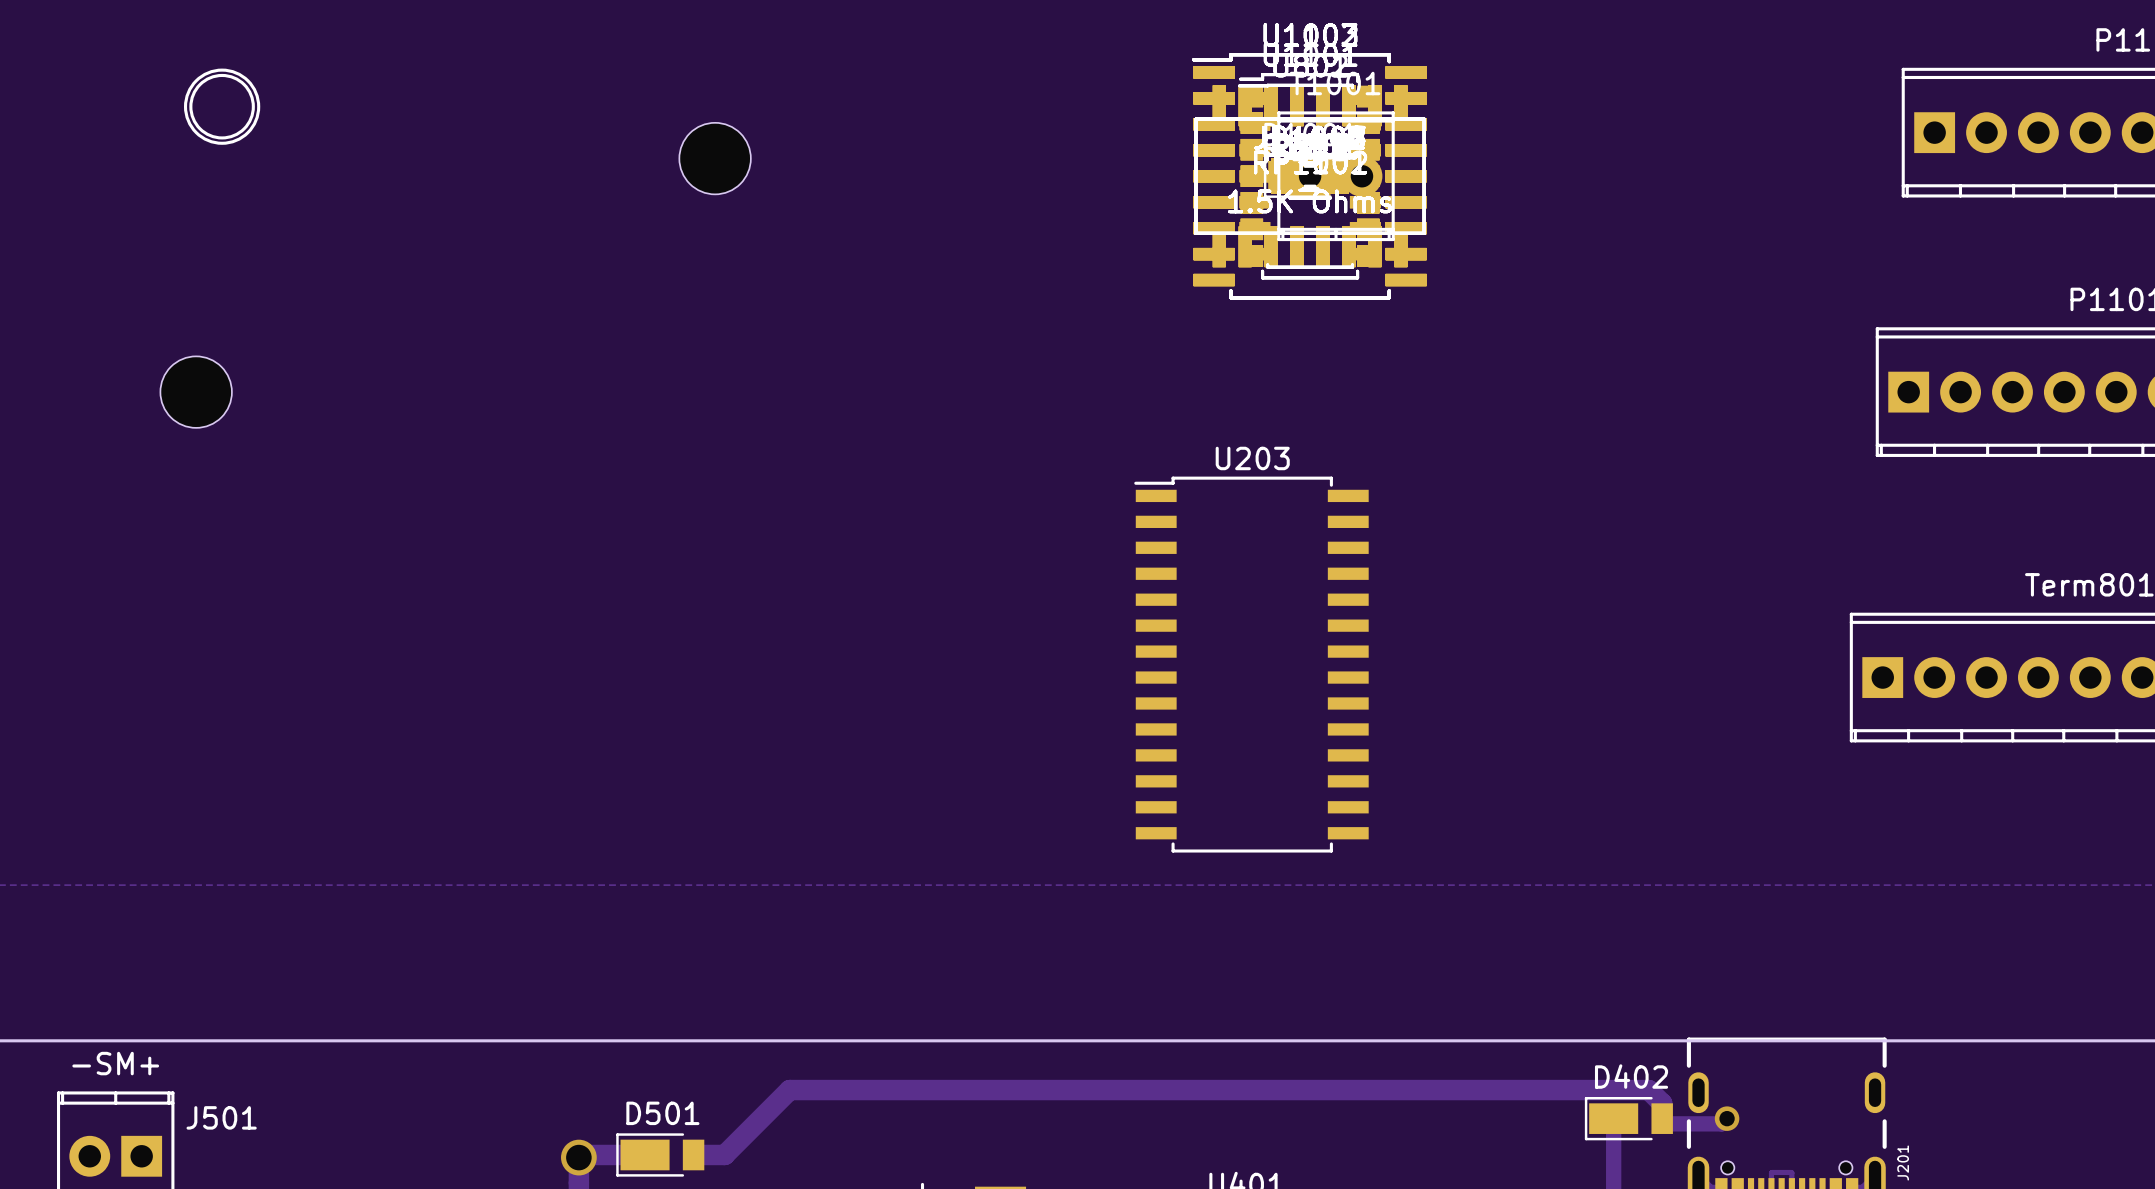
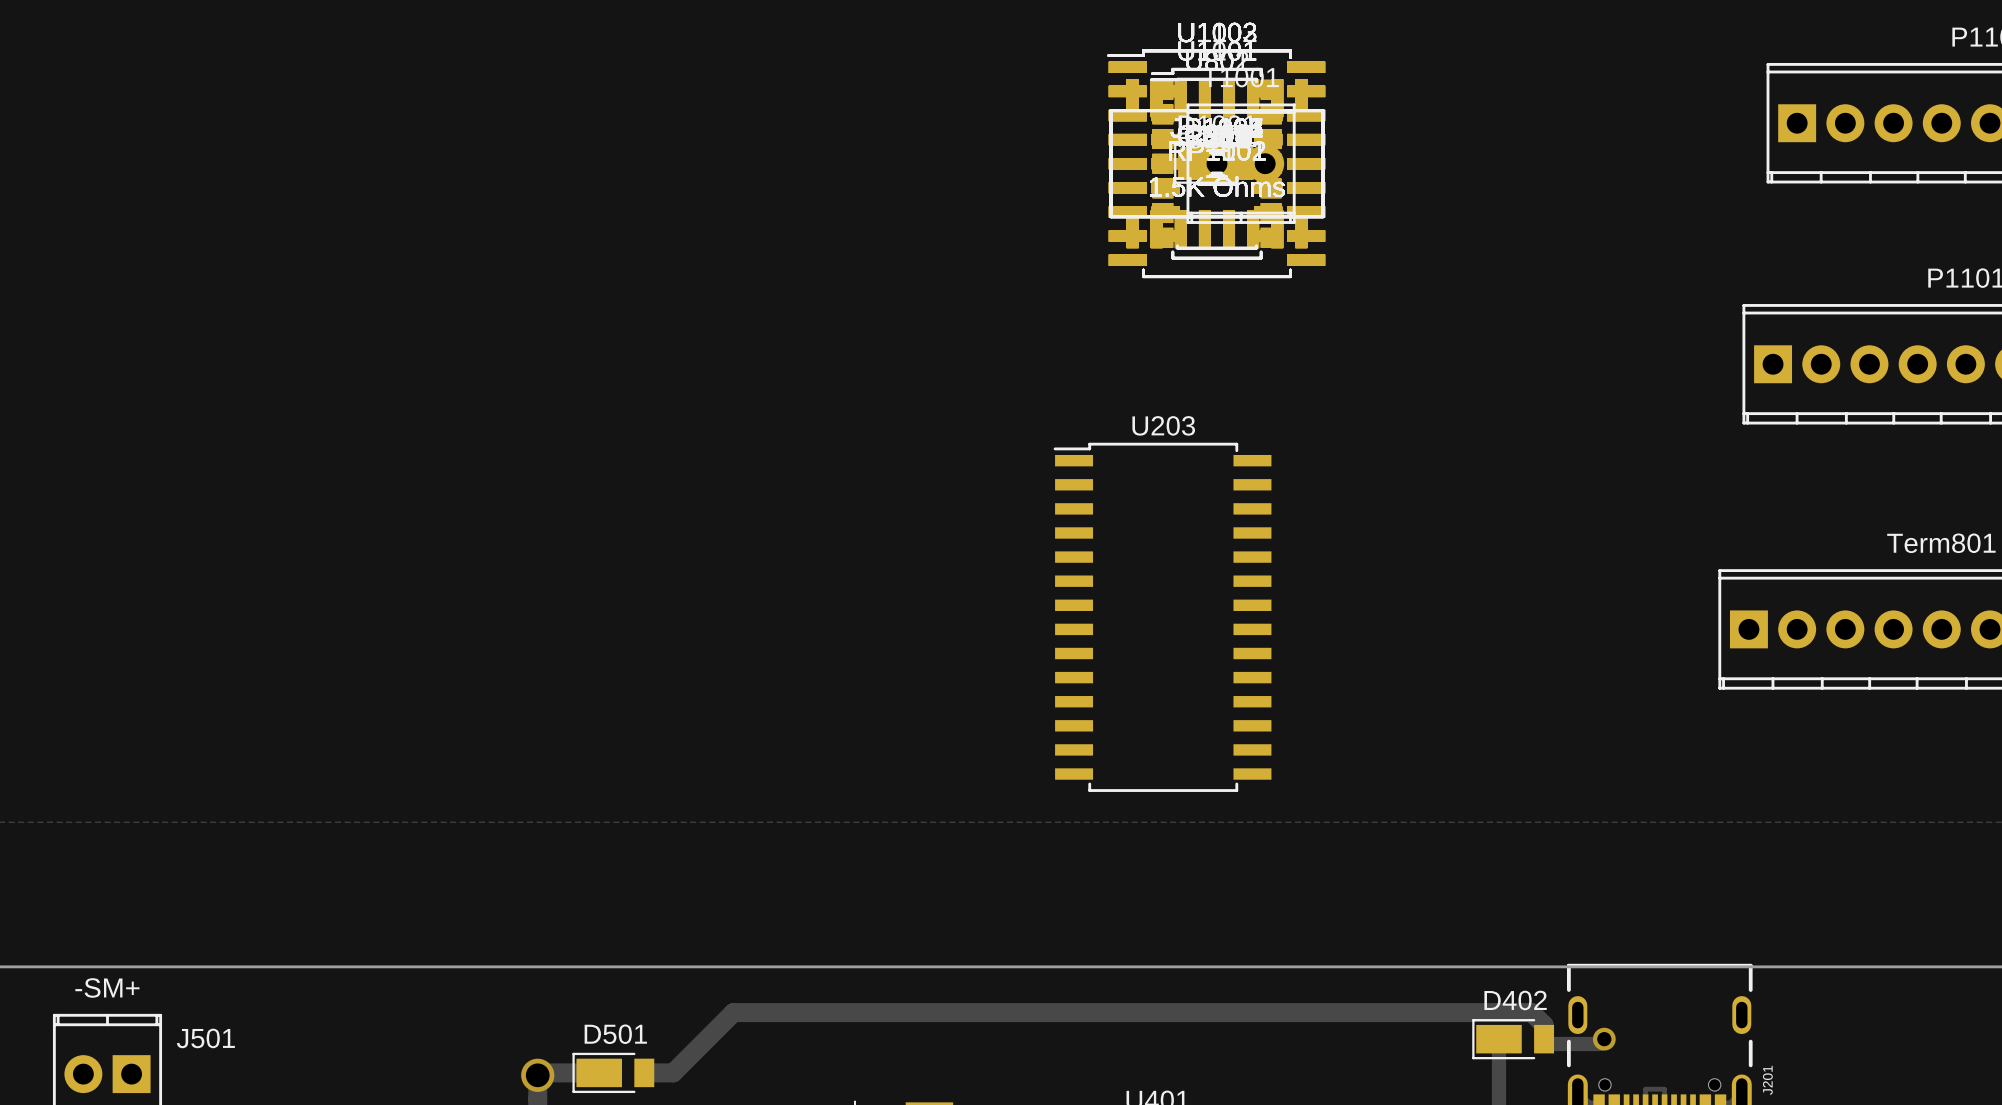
drawing: [183, 68, 261, 145] -> none
part: (715, 158) -> none
part: (196, 392) -> none

